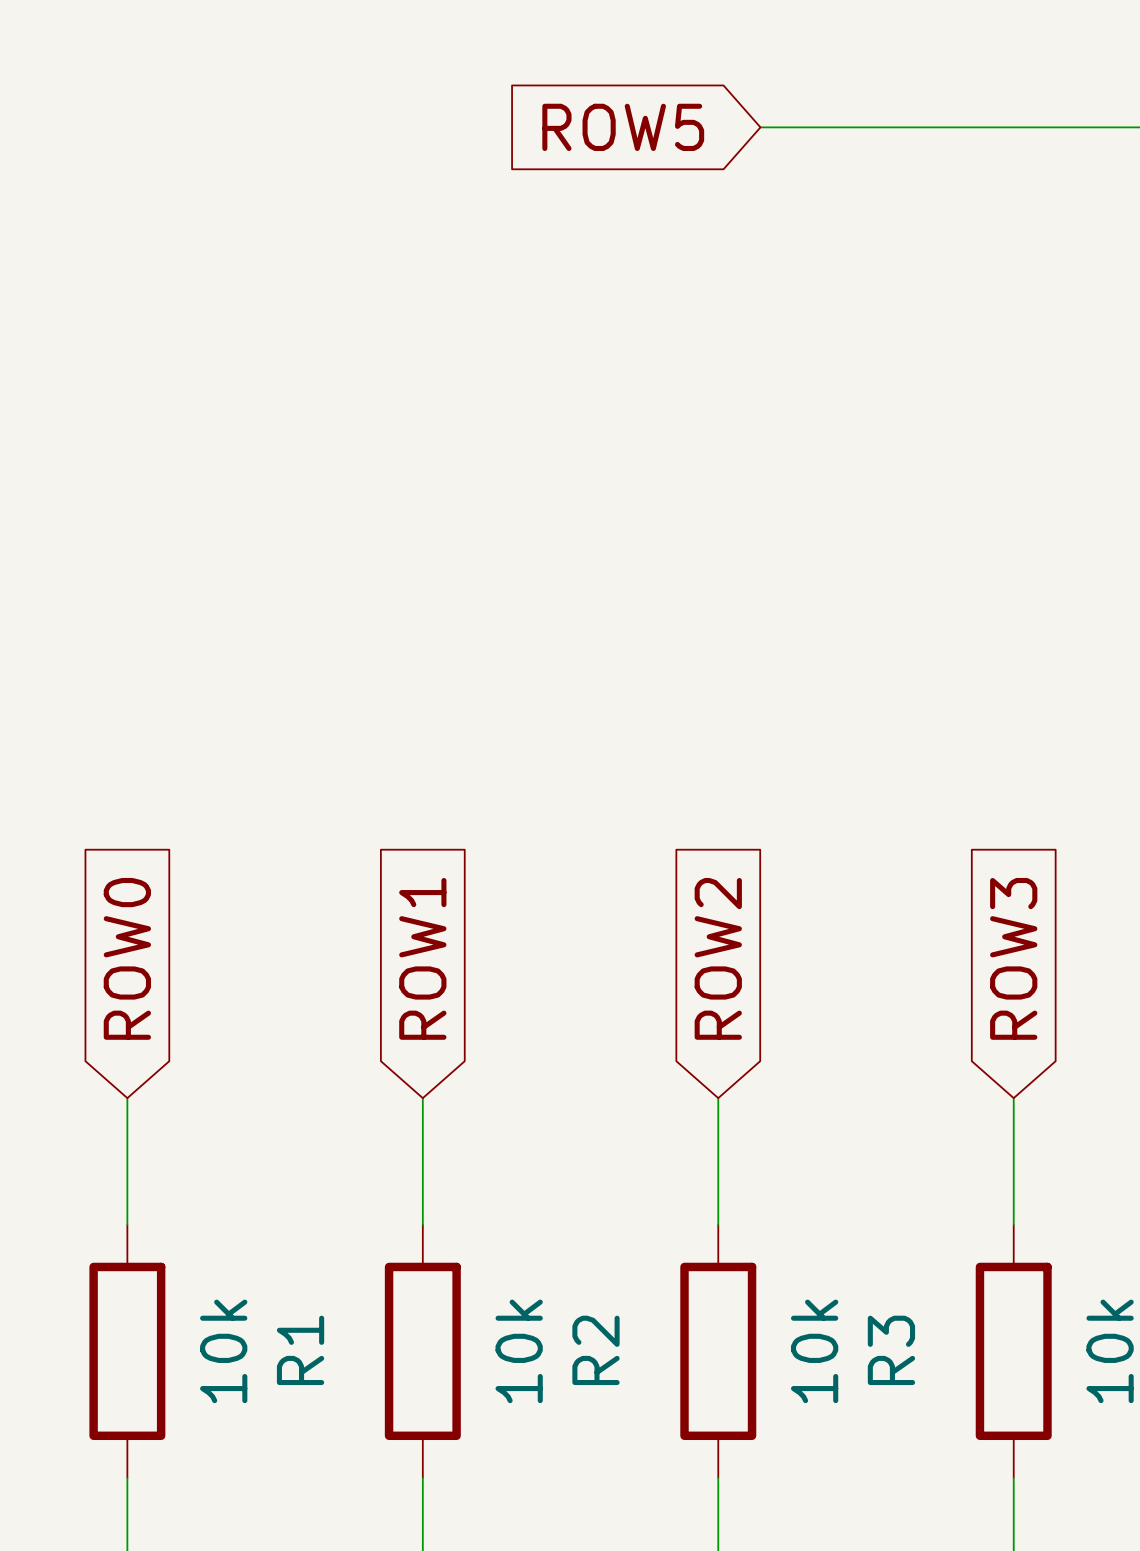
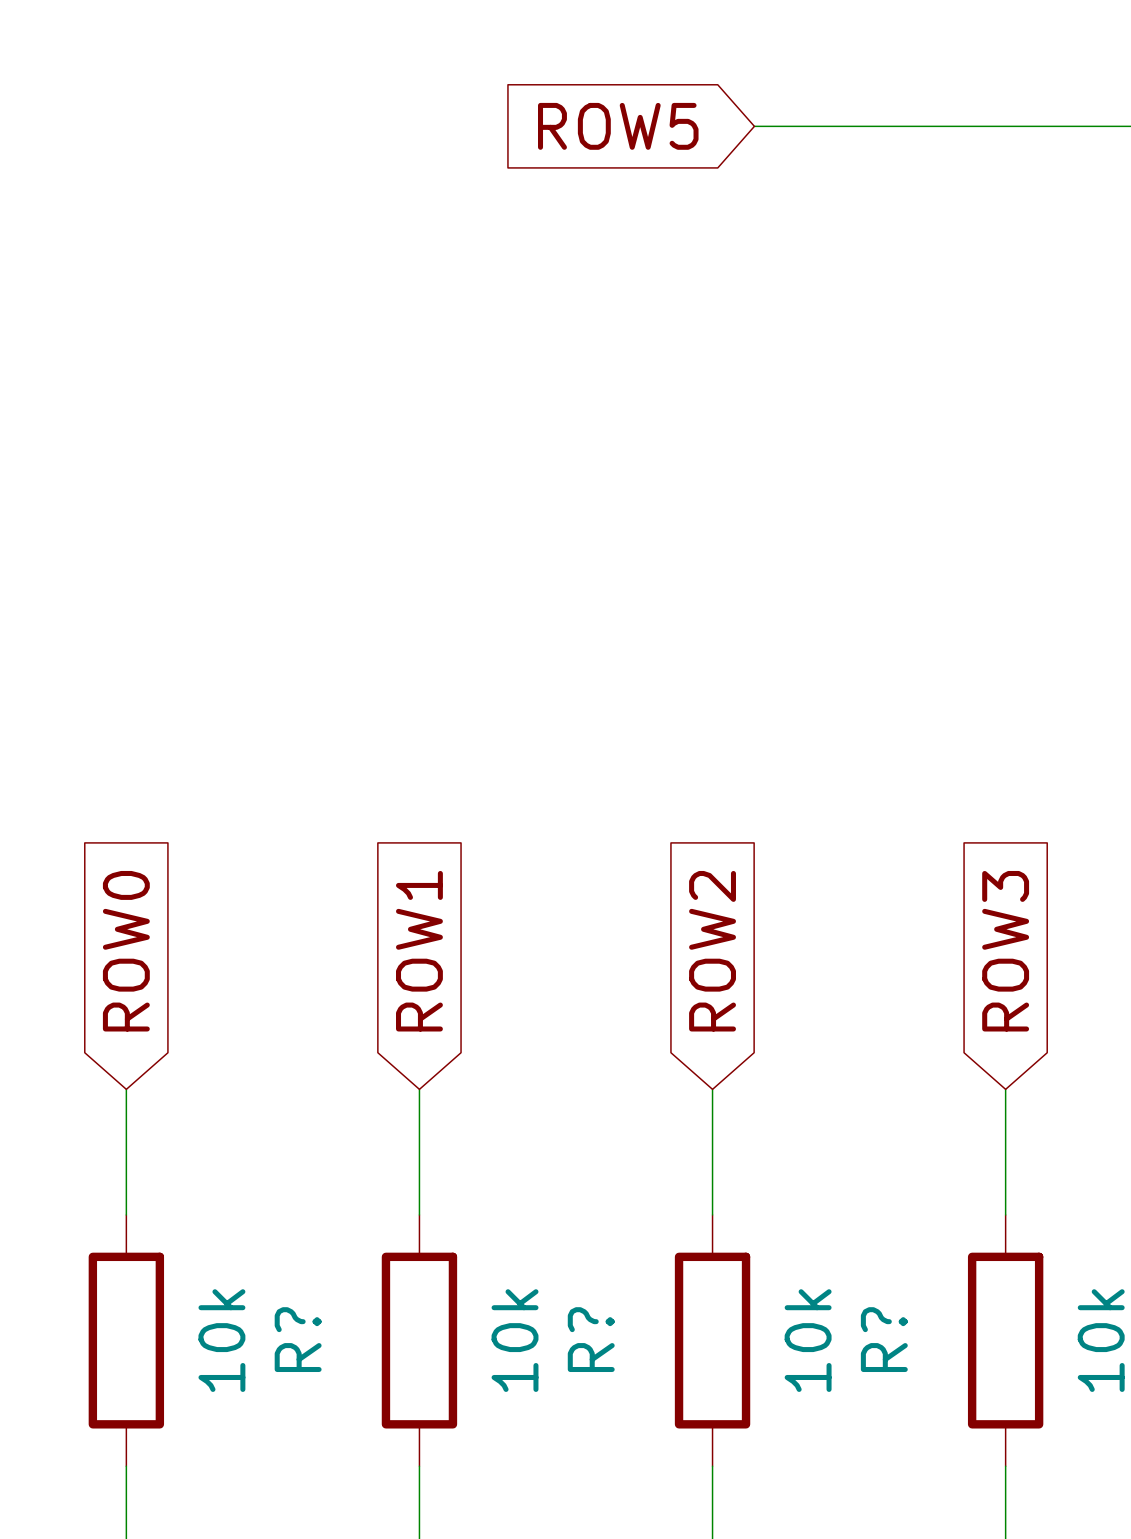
R1 name: R1 (300, 1350) -> R? (298, 1339)
R2 name: R2 (595, 1350) -> R? (591, 1339)
R3 name: R3 (891, 1350) -> R? (884, 1339)

